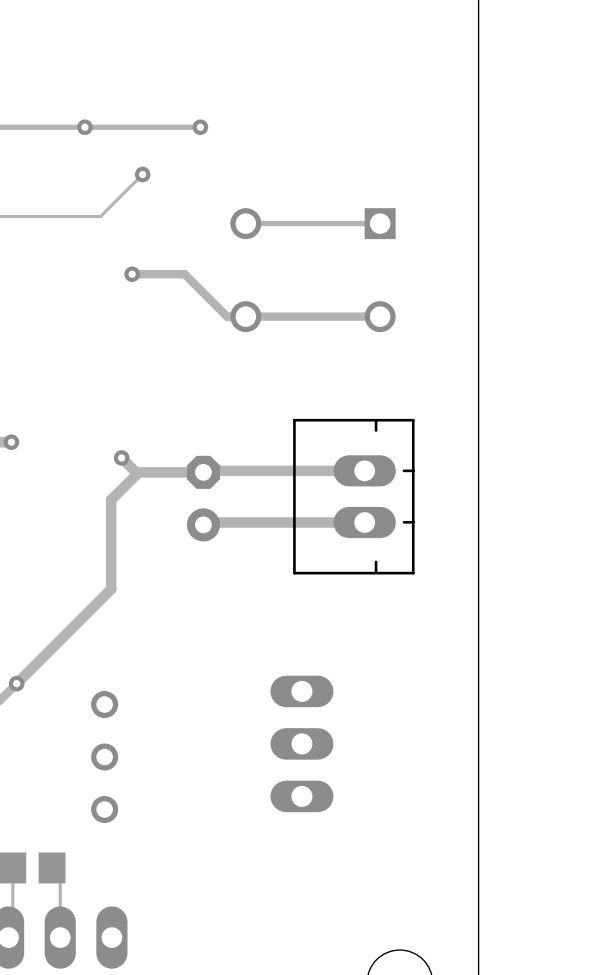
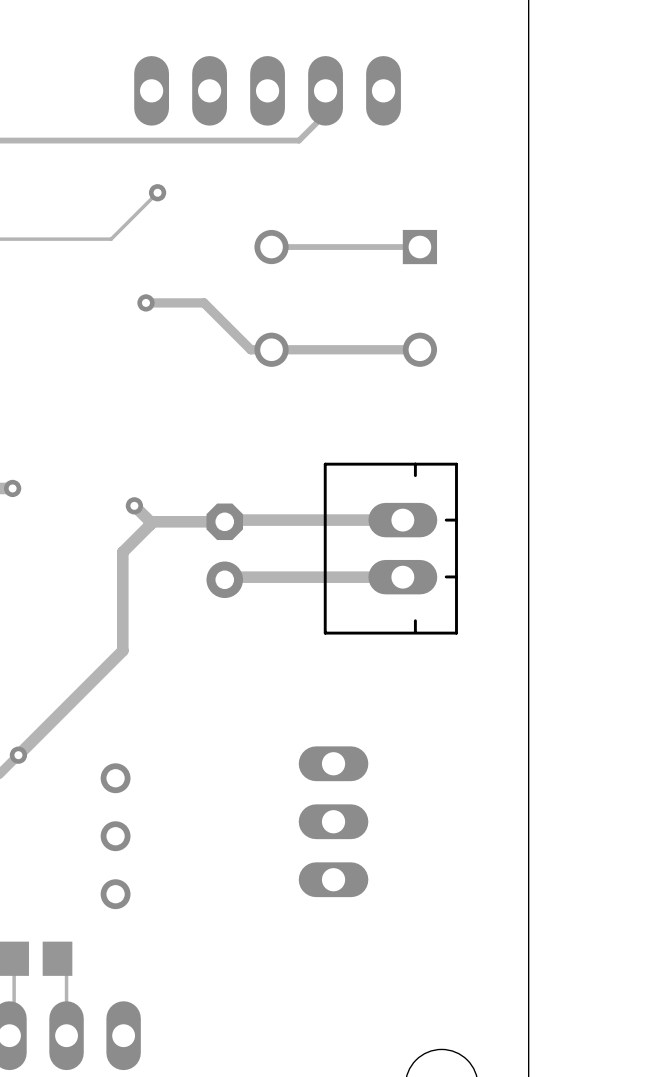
part: none -> (267, 90)
track: none -> (325, 90) (325, 114) (299, 140) (221, 140)
via: (84, 127) -> none
via: (200, 127) -> none

